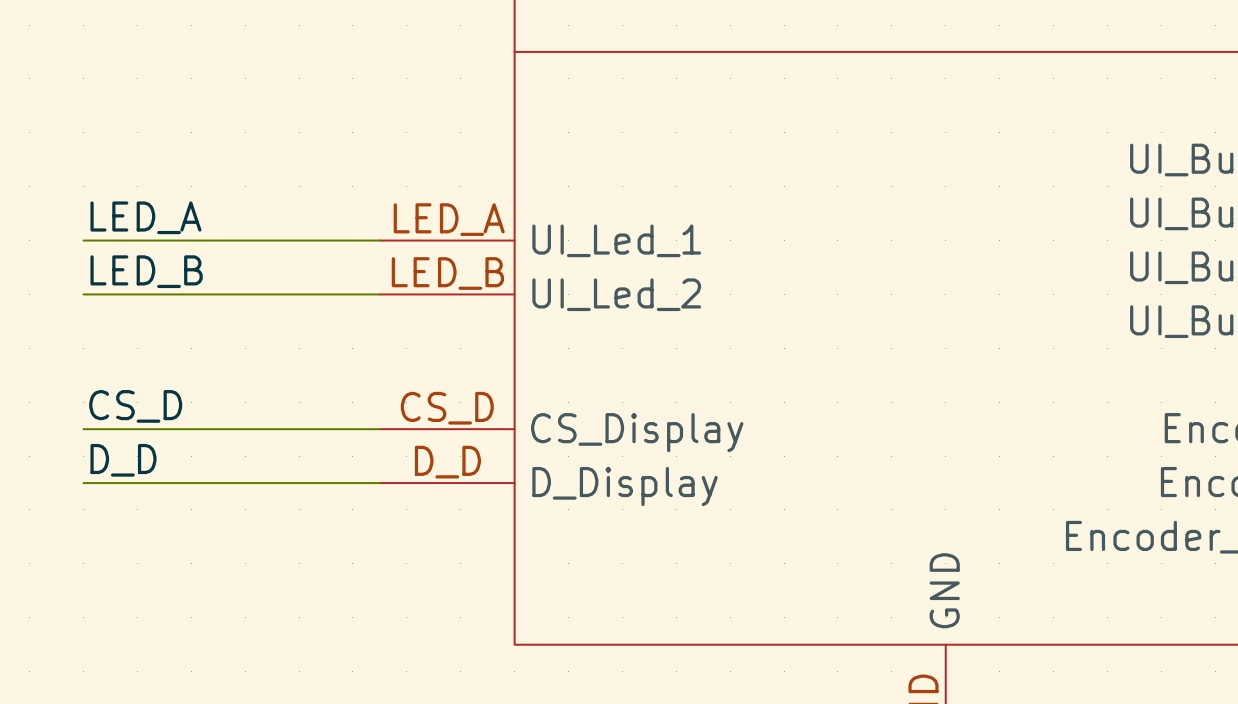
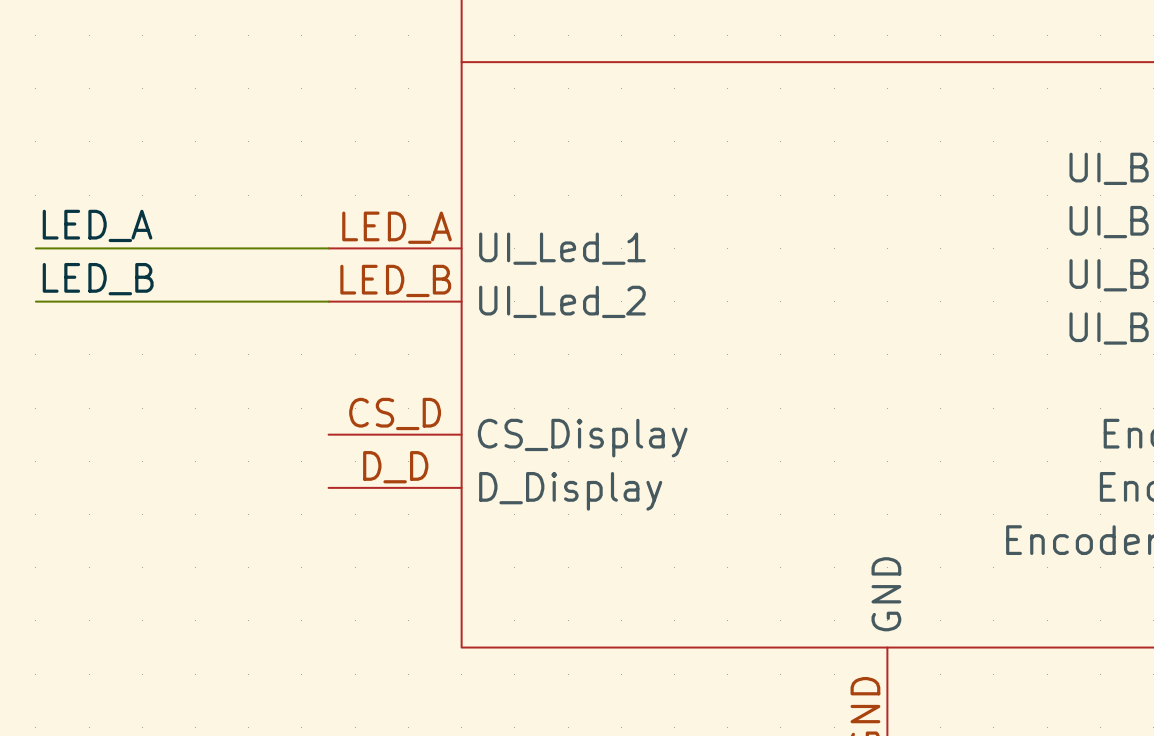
label: CS_D (135, 406) -> none
wire: (83, 429) (379, 429) -> none
label: D_D (123, 460) -> none
wire: (83, 483) (379, 483) -> none

